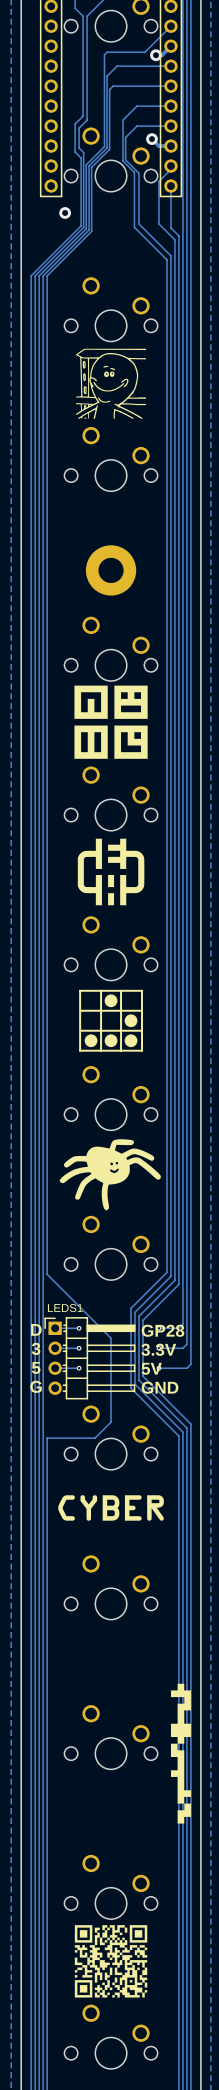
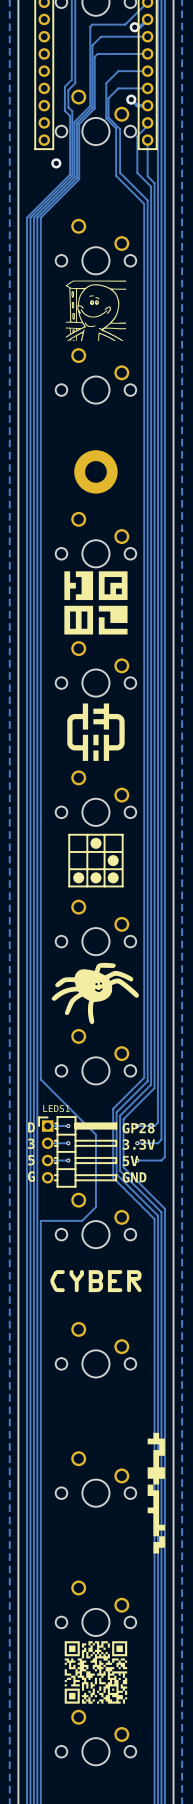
drawing shape: [74, 685, 148, 759] -> [64, 571, 128, 635]

